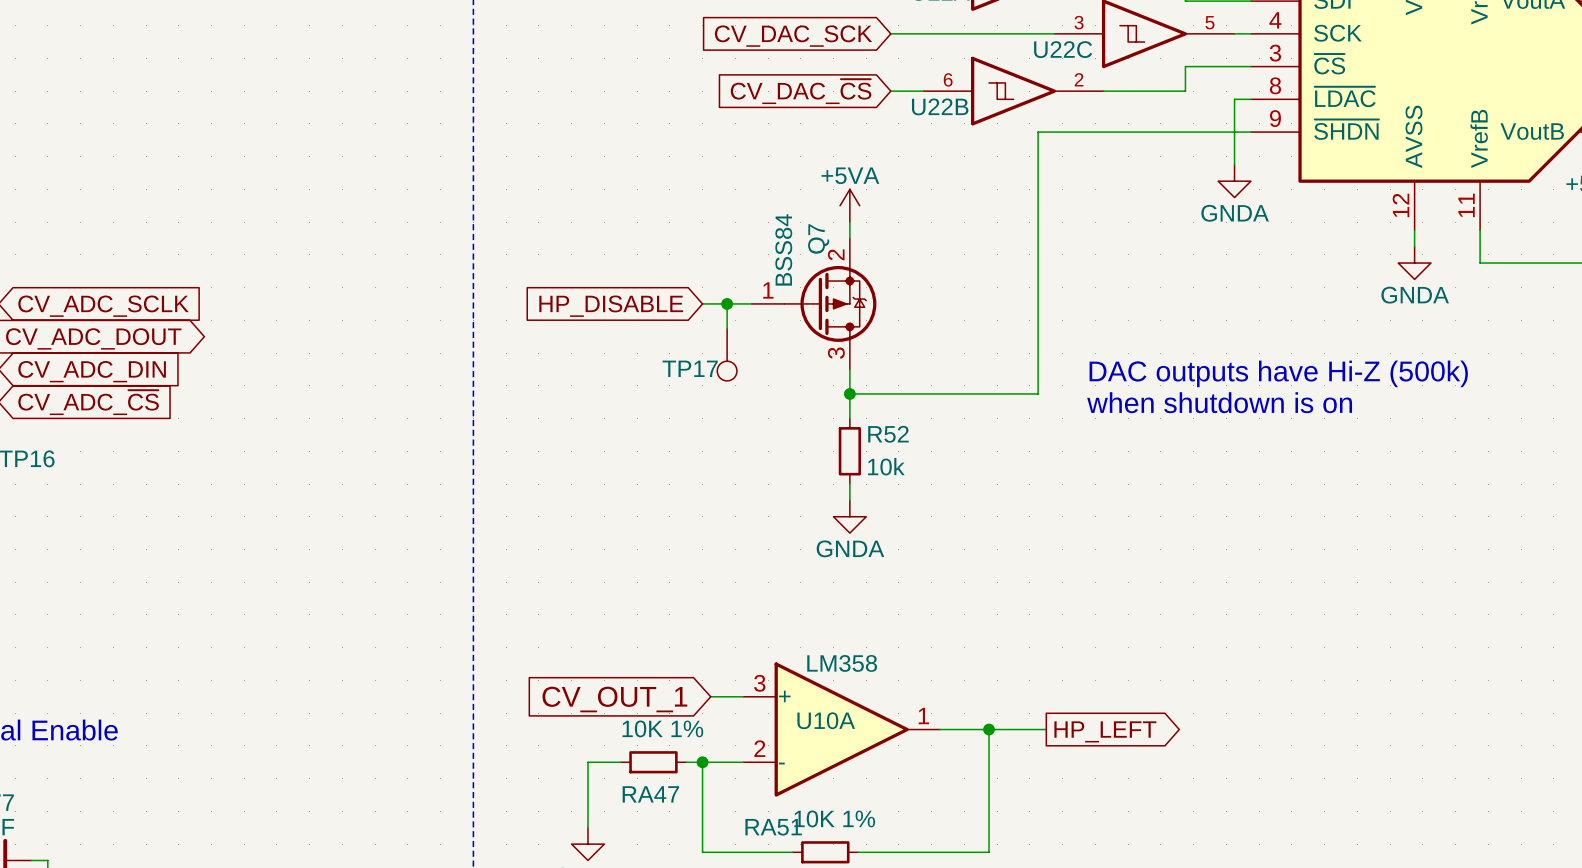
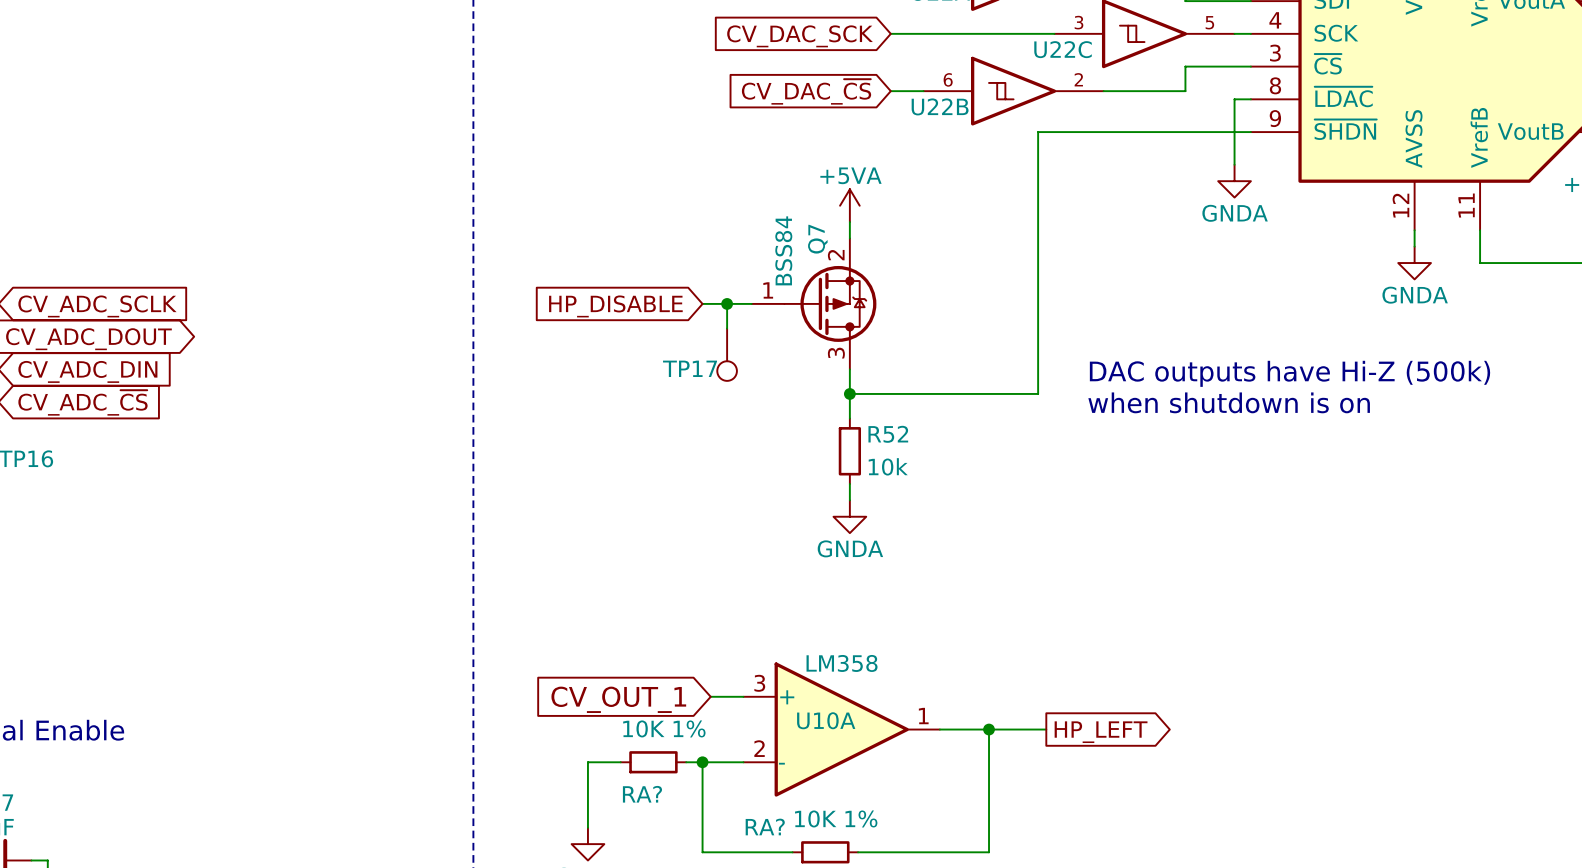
RA47 name: RA47 (650, 794) -> RA? (642, 794)
RA51 name: RA51 (773, 827) -> RA? (765, 826)

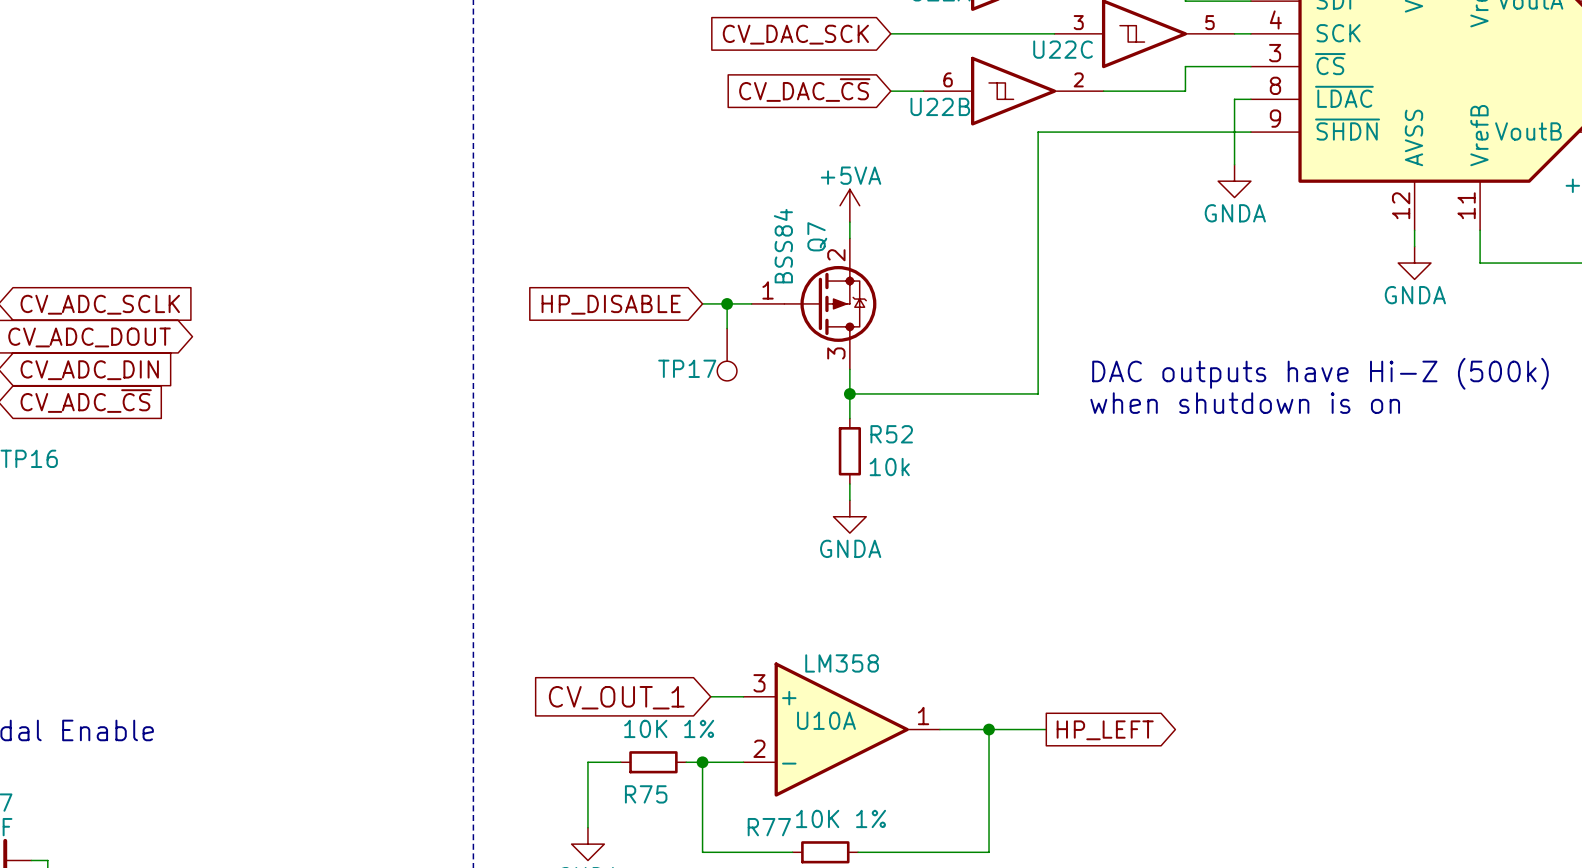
RA? name: RA? (642, 794) -> R75 (646, 794)
RA? name: RA? (765, 826) -> R77 (769, 827)

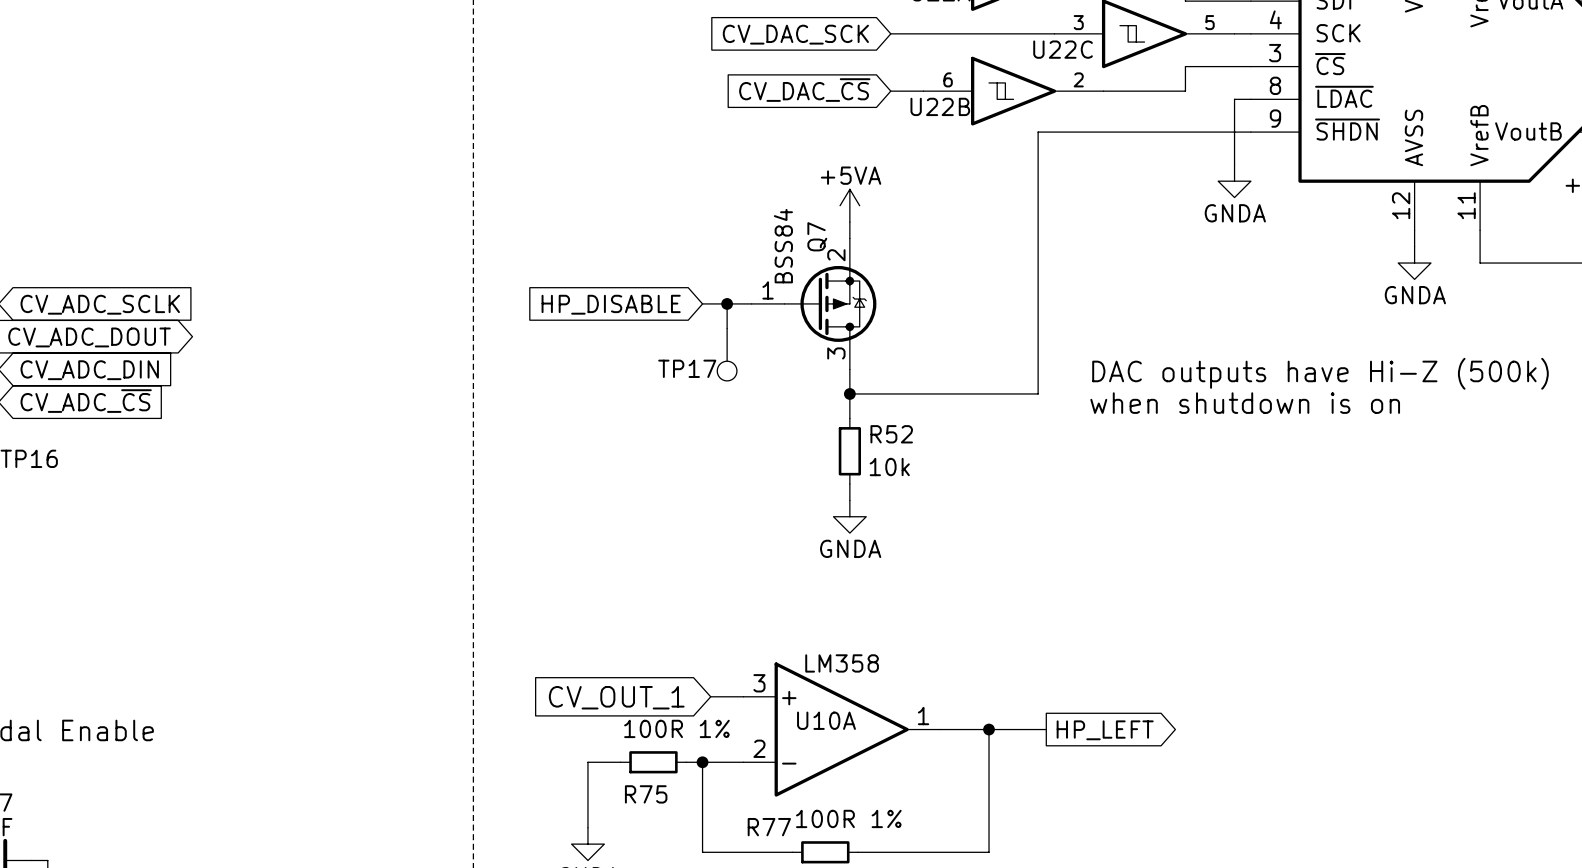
R75 value: 10K 1% (669, 728) -> 100R 1% (676, 728)
R77 value: 10K 1% (841, 818) -> 100R 1% (848, 818)

